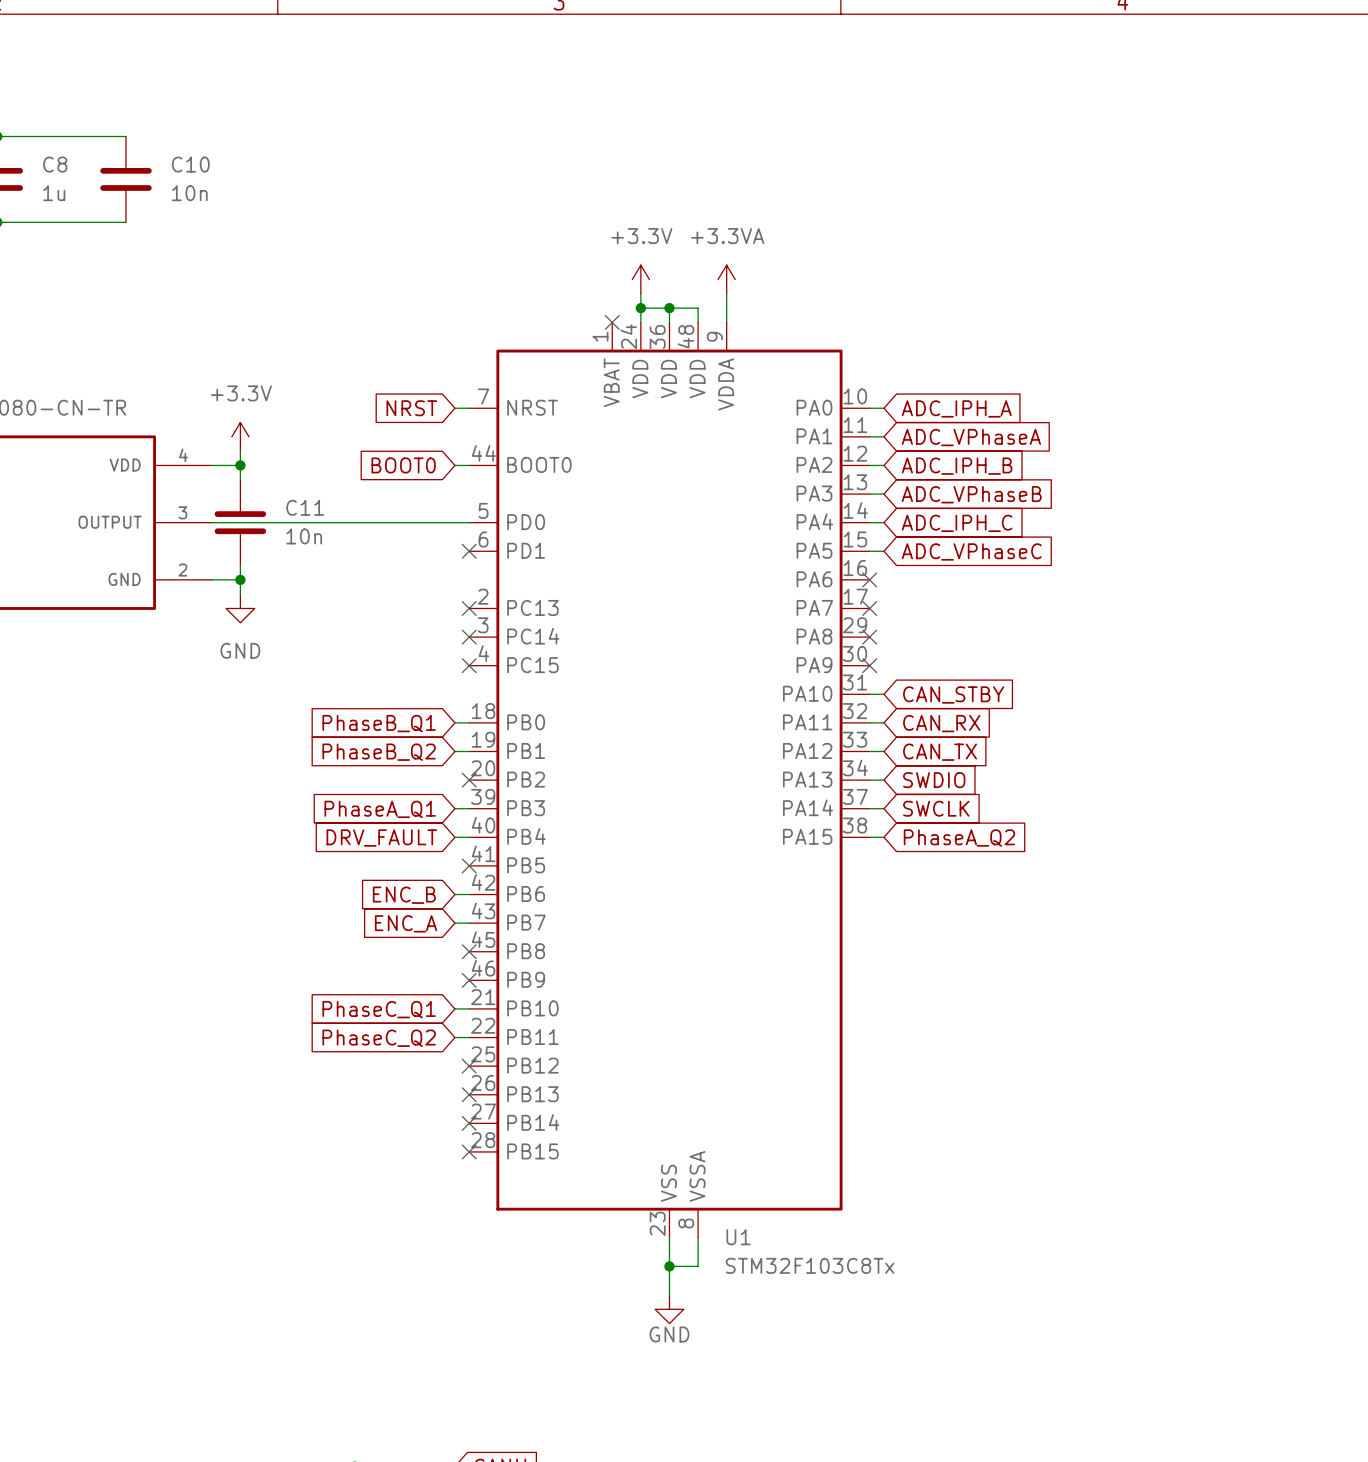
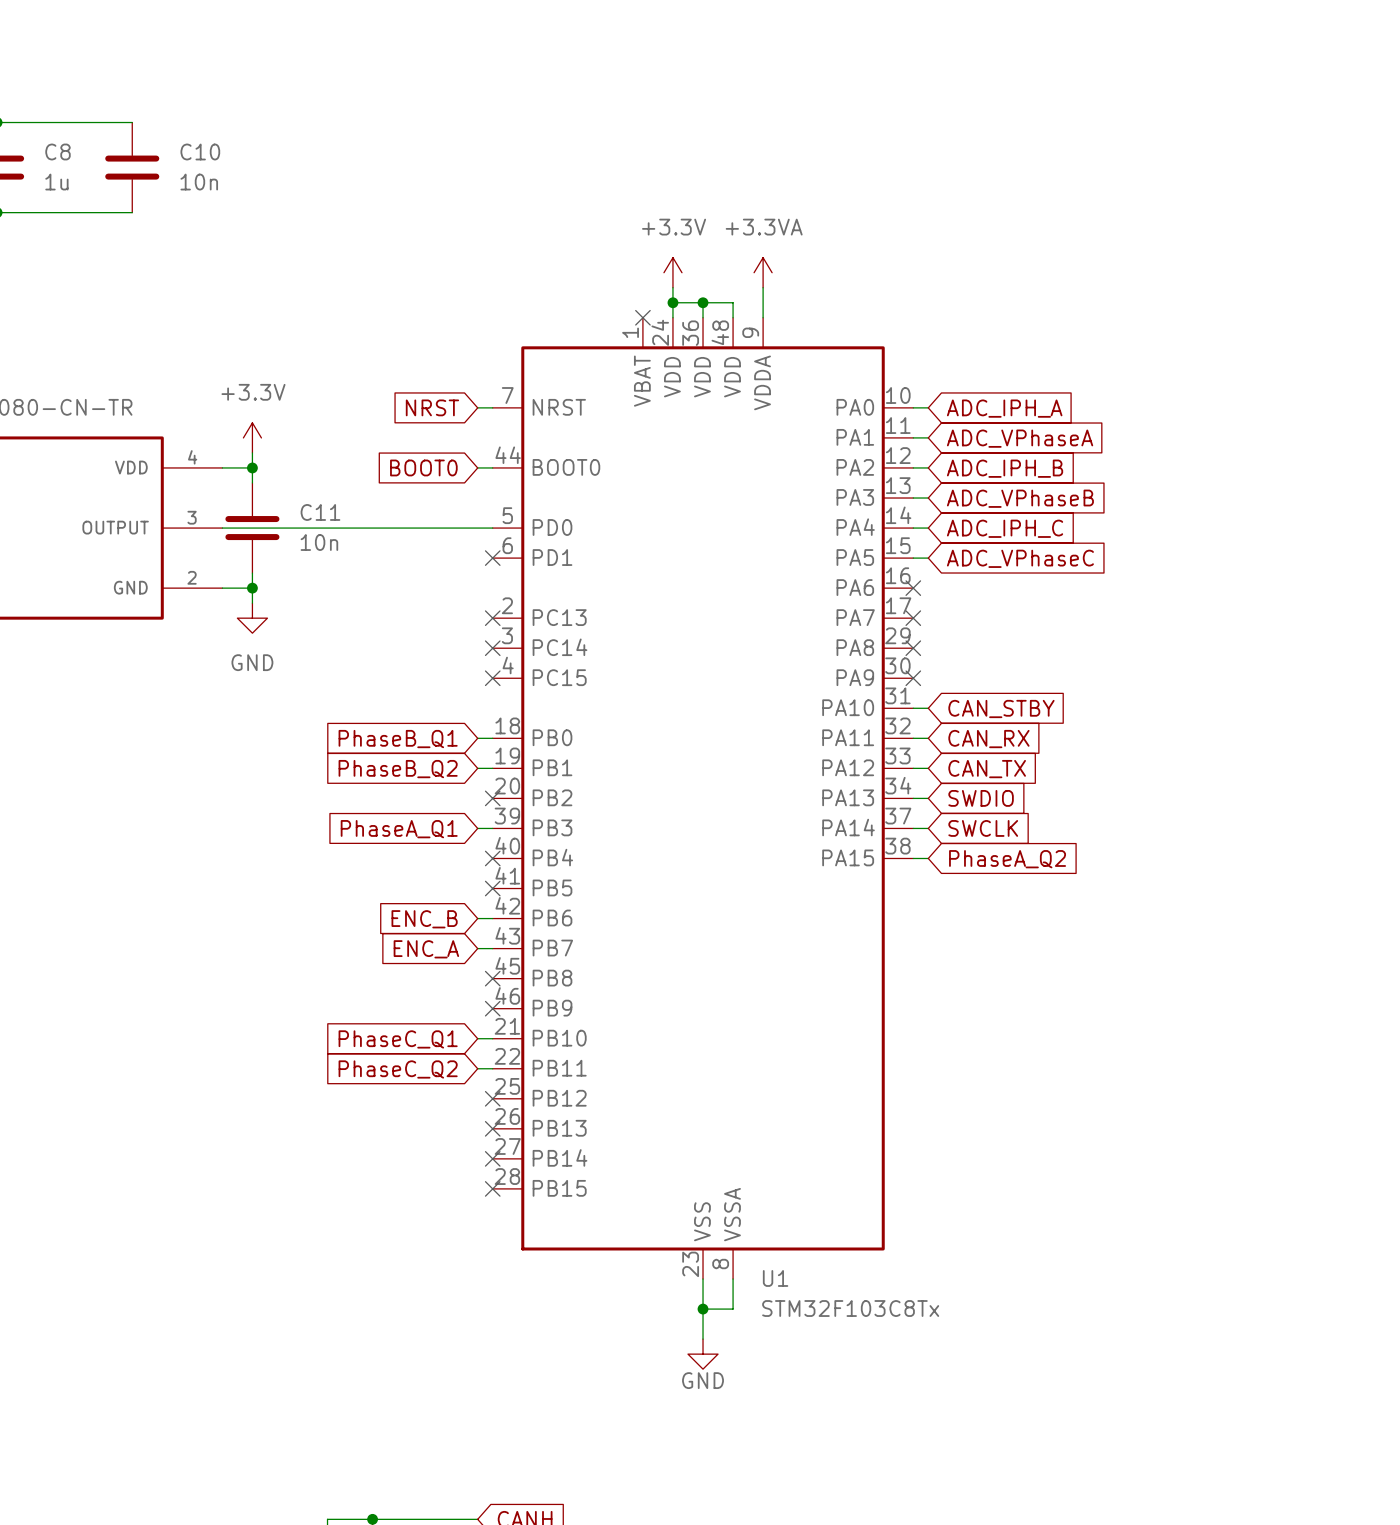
wire: (454, 837) (469, 837) -> none
no-connect mark: none -> (492, 858)
global label: DRV_FAULT (381, 838) -> none

